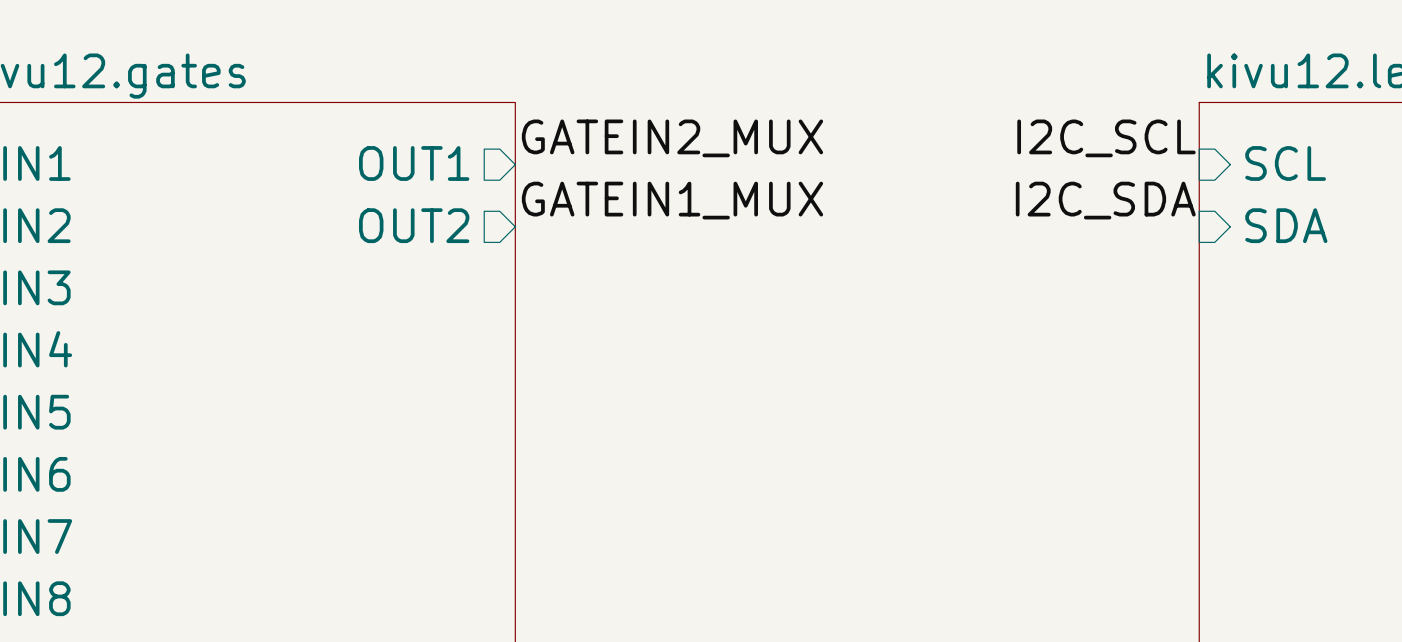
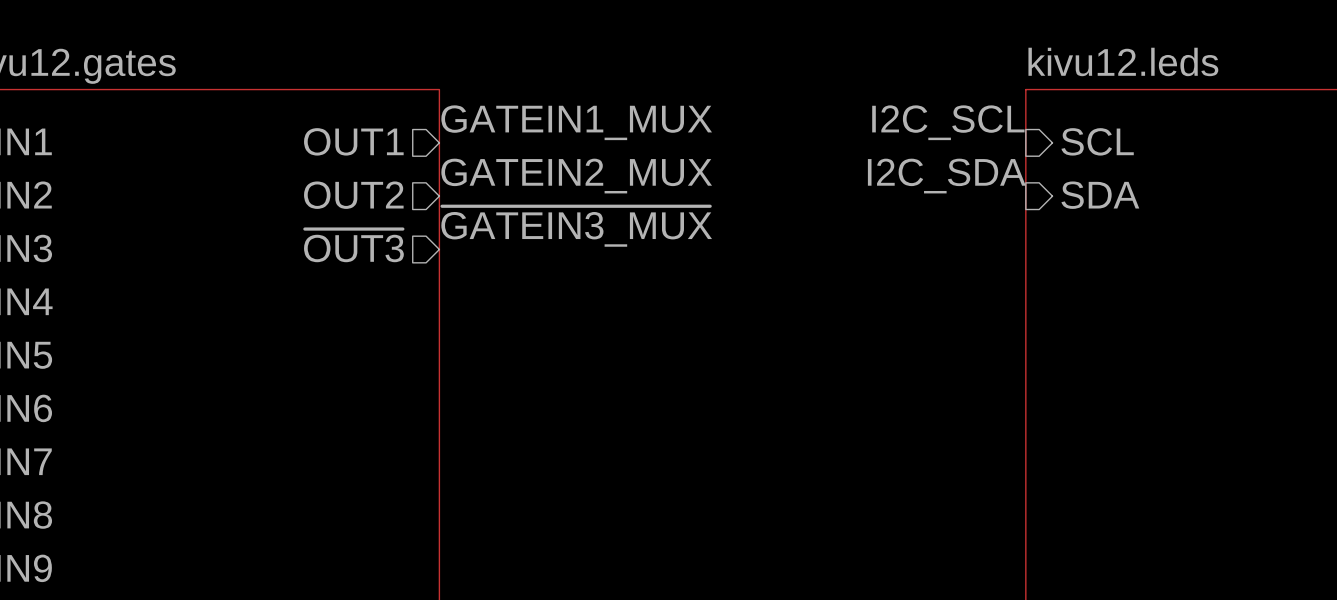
label: GATEIN2_MUX (672, 138) -> GATEIN1_MUX (576, 122)
label: GATEIN1_MUX (672, 200) -> GATEIN2_MUX (576, 176)
label: none -> ~{GATEIN3_MUX} (576, 226)
sheet pin: none -> ~{OUT3} (353, 245)

